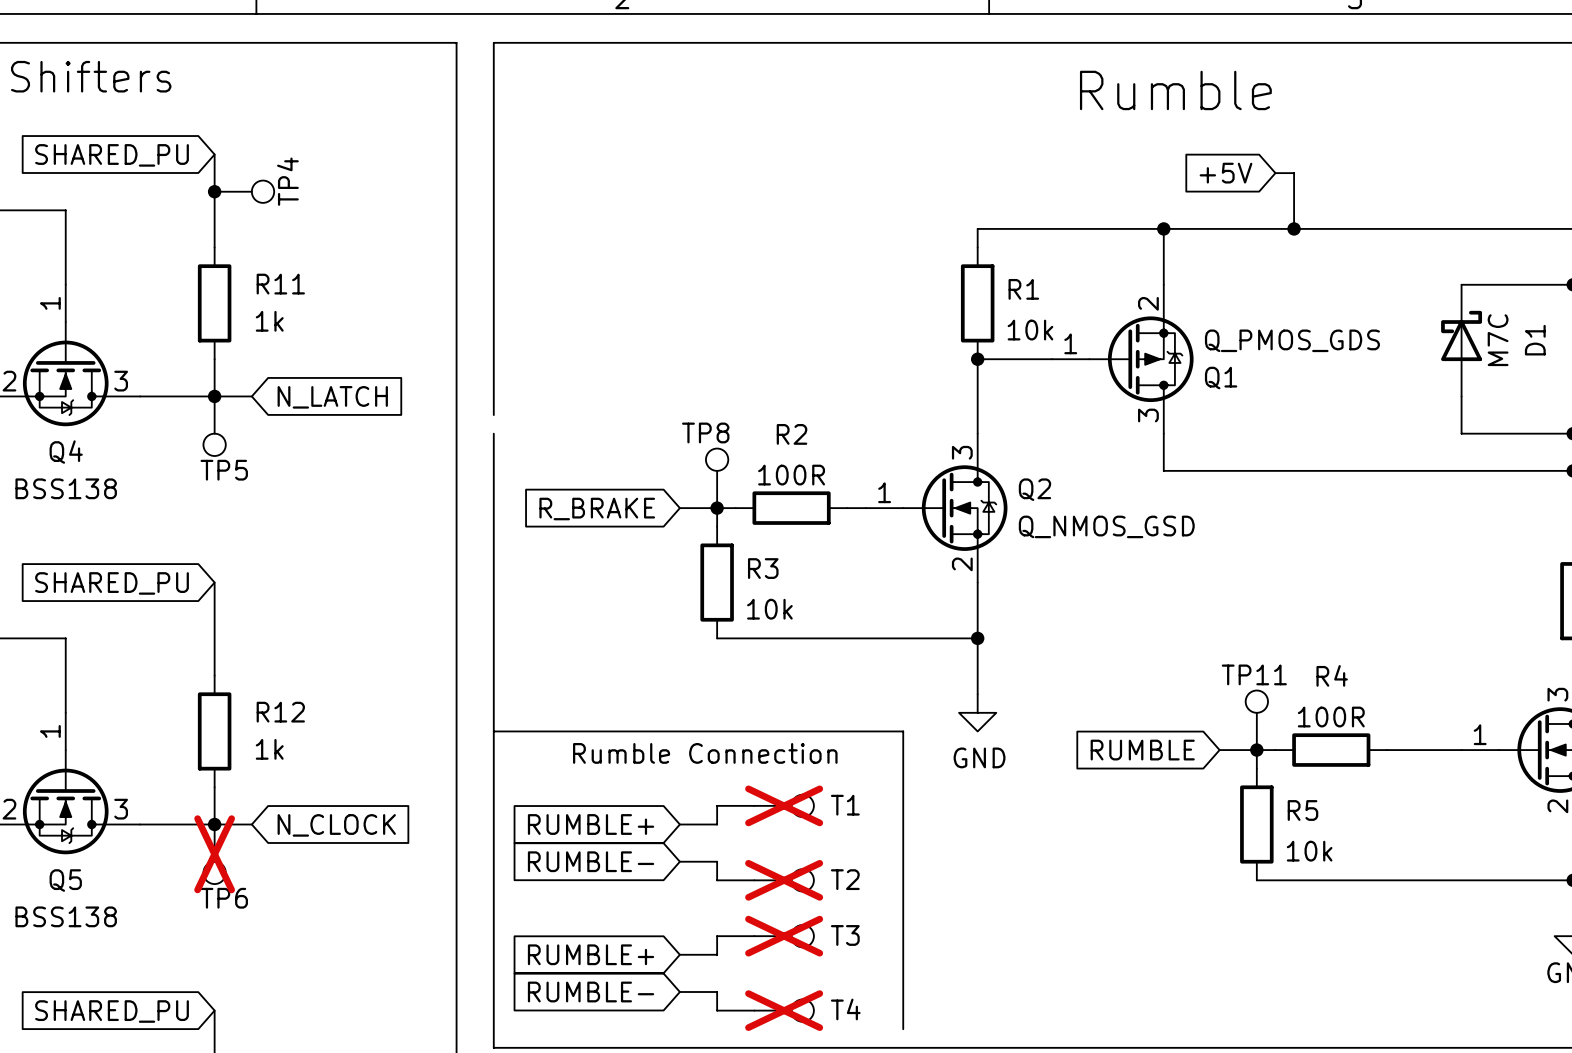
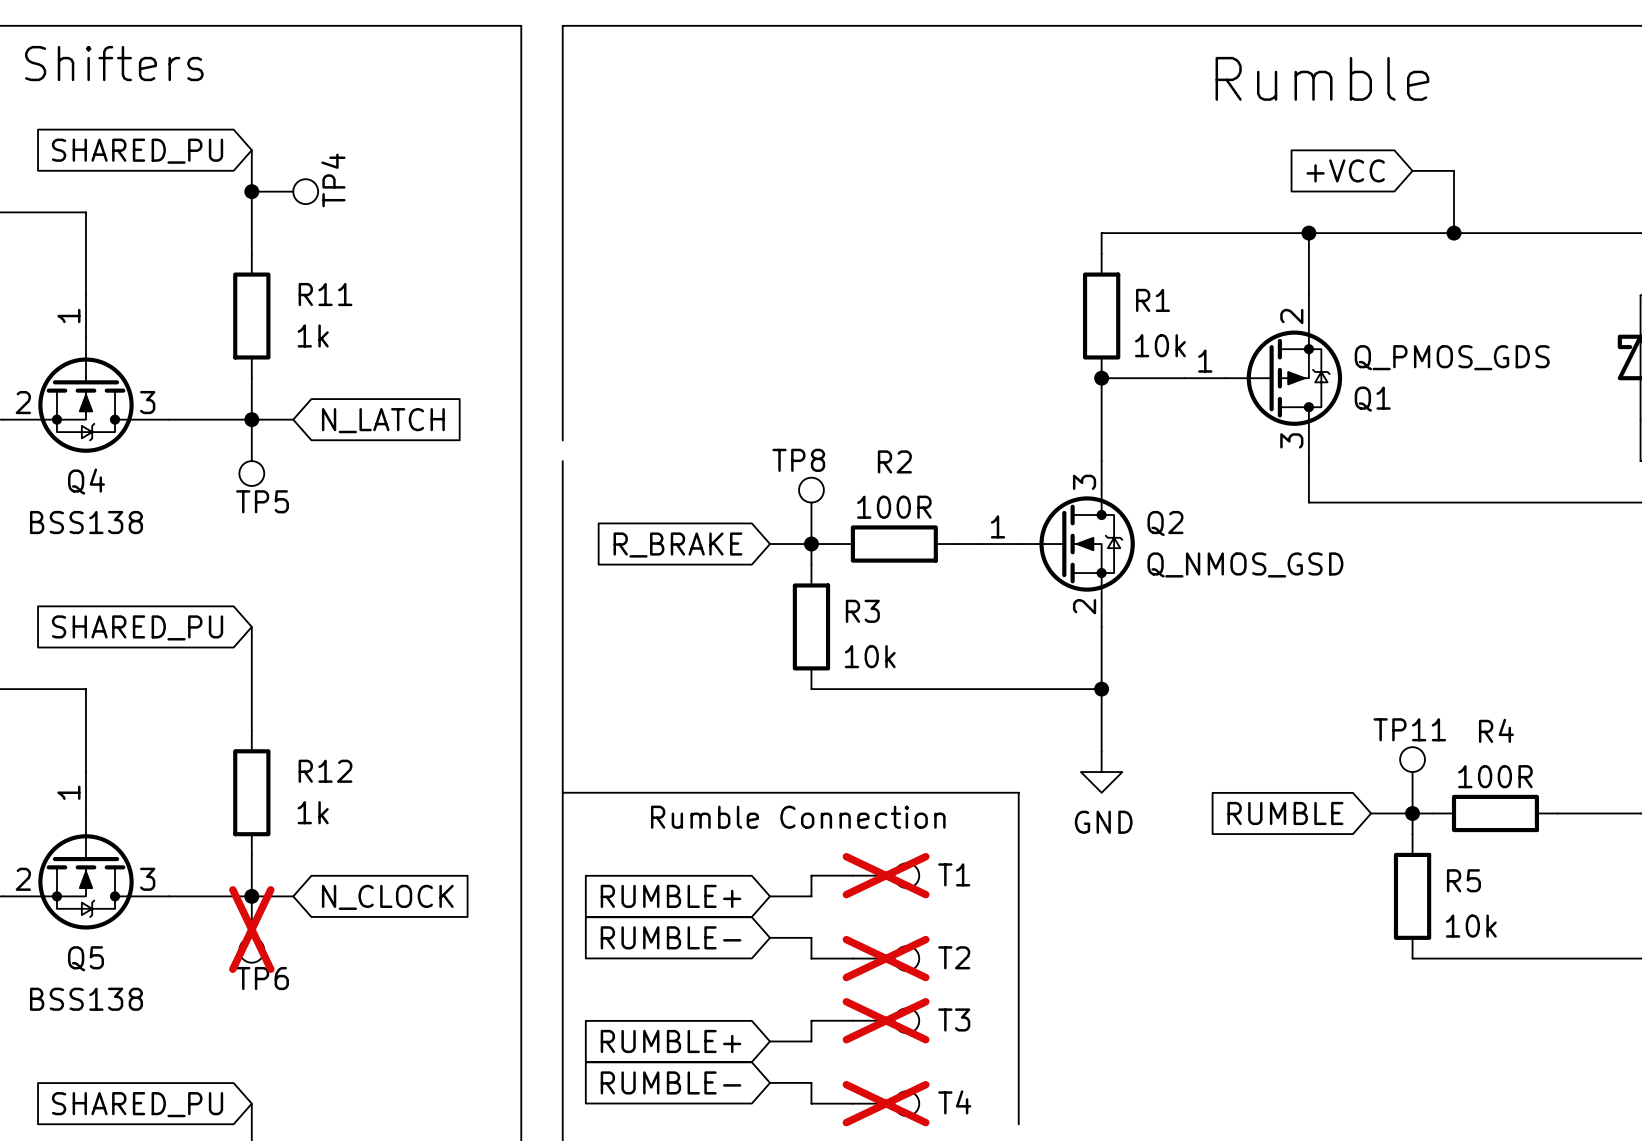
global label: none -> +VCC (1345, 170)
global label: +5V (1226, 173) -> none
wire: none -> (1412, 170) (1433, 170)

